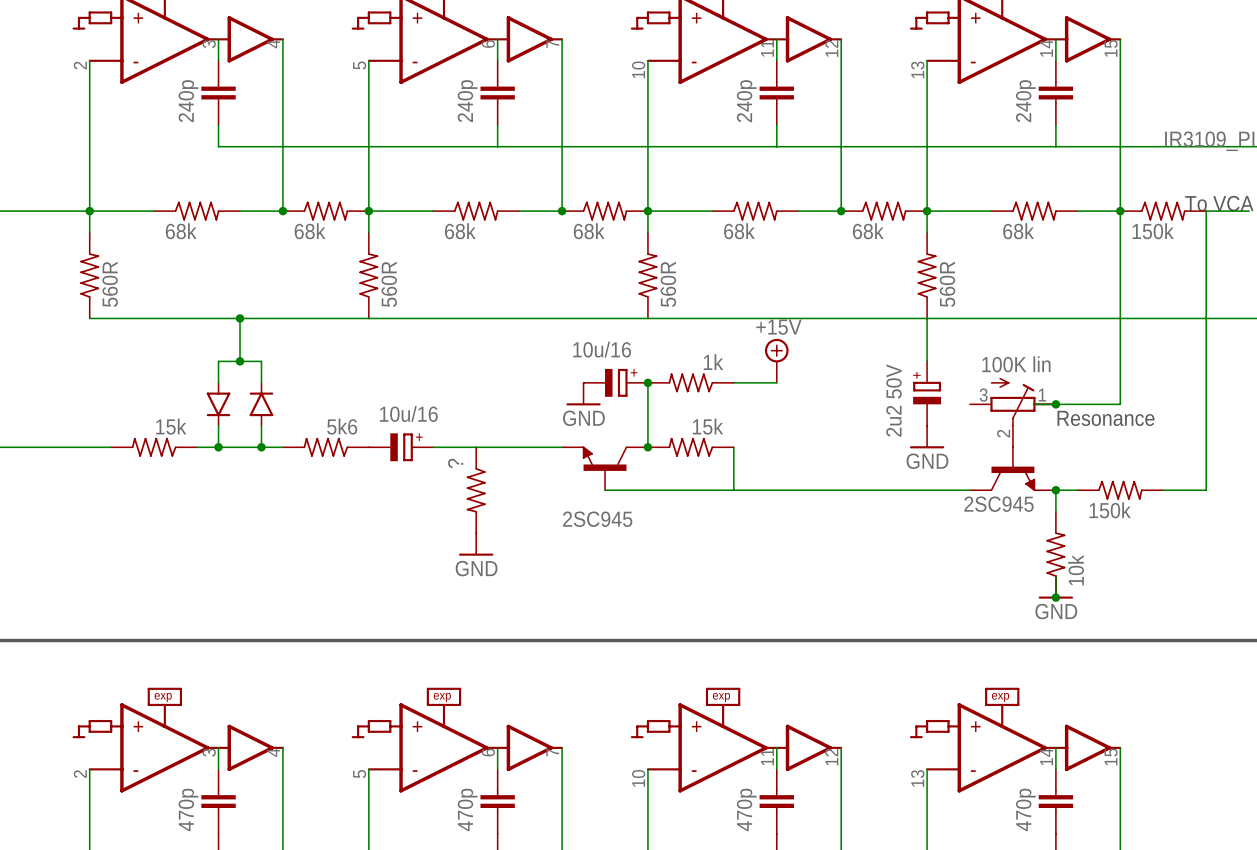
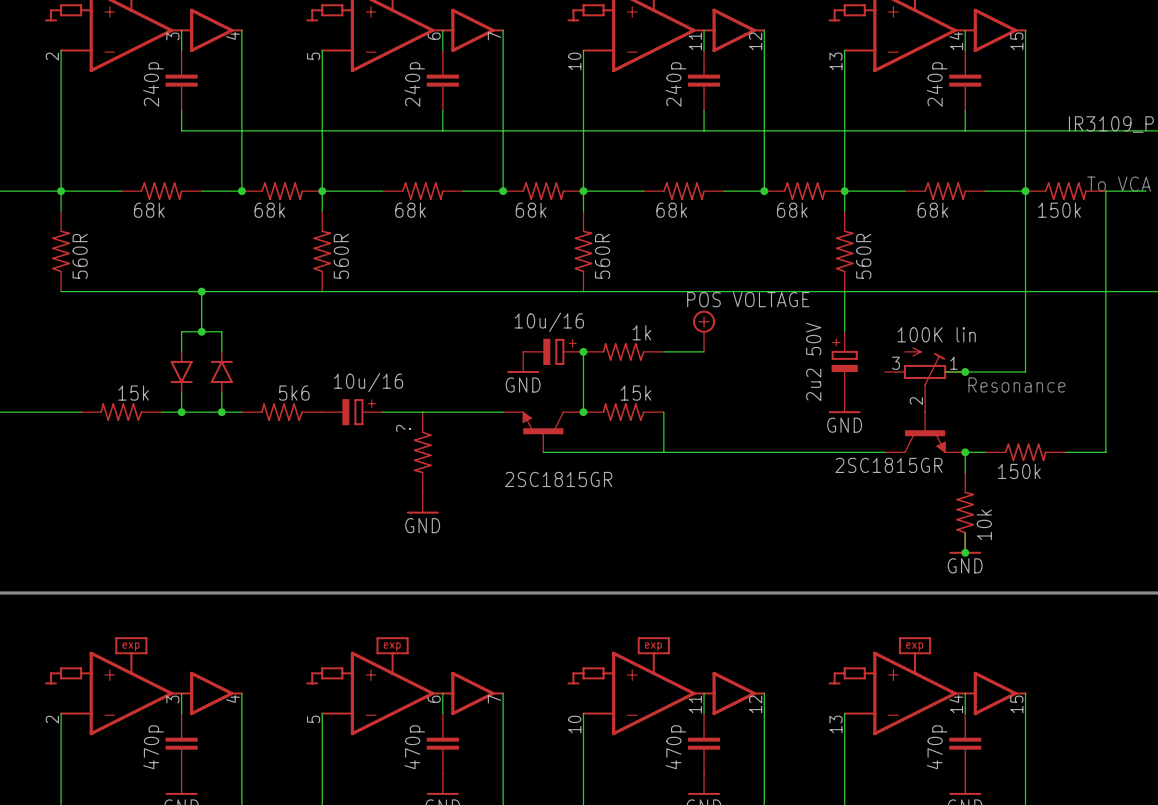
power symbol: +15V (776, 360) -> POS VOLTAGE (704, 331)
part value: 2SC945 (998, 504) -> 2SC1815GR (888, 465)
part value: 2SC945 (597, 519) -> 2SC1815GR (558, 479)

